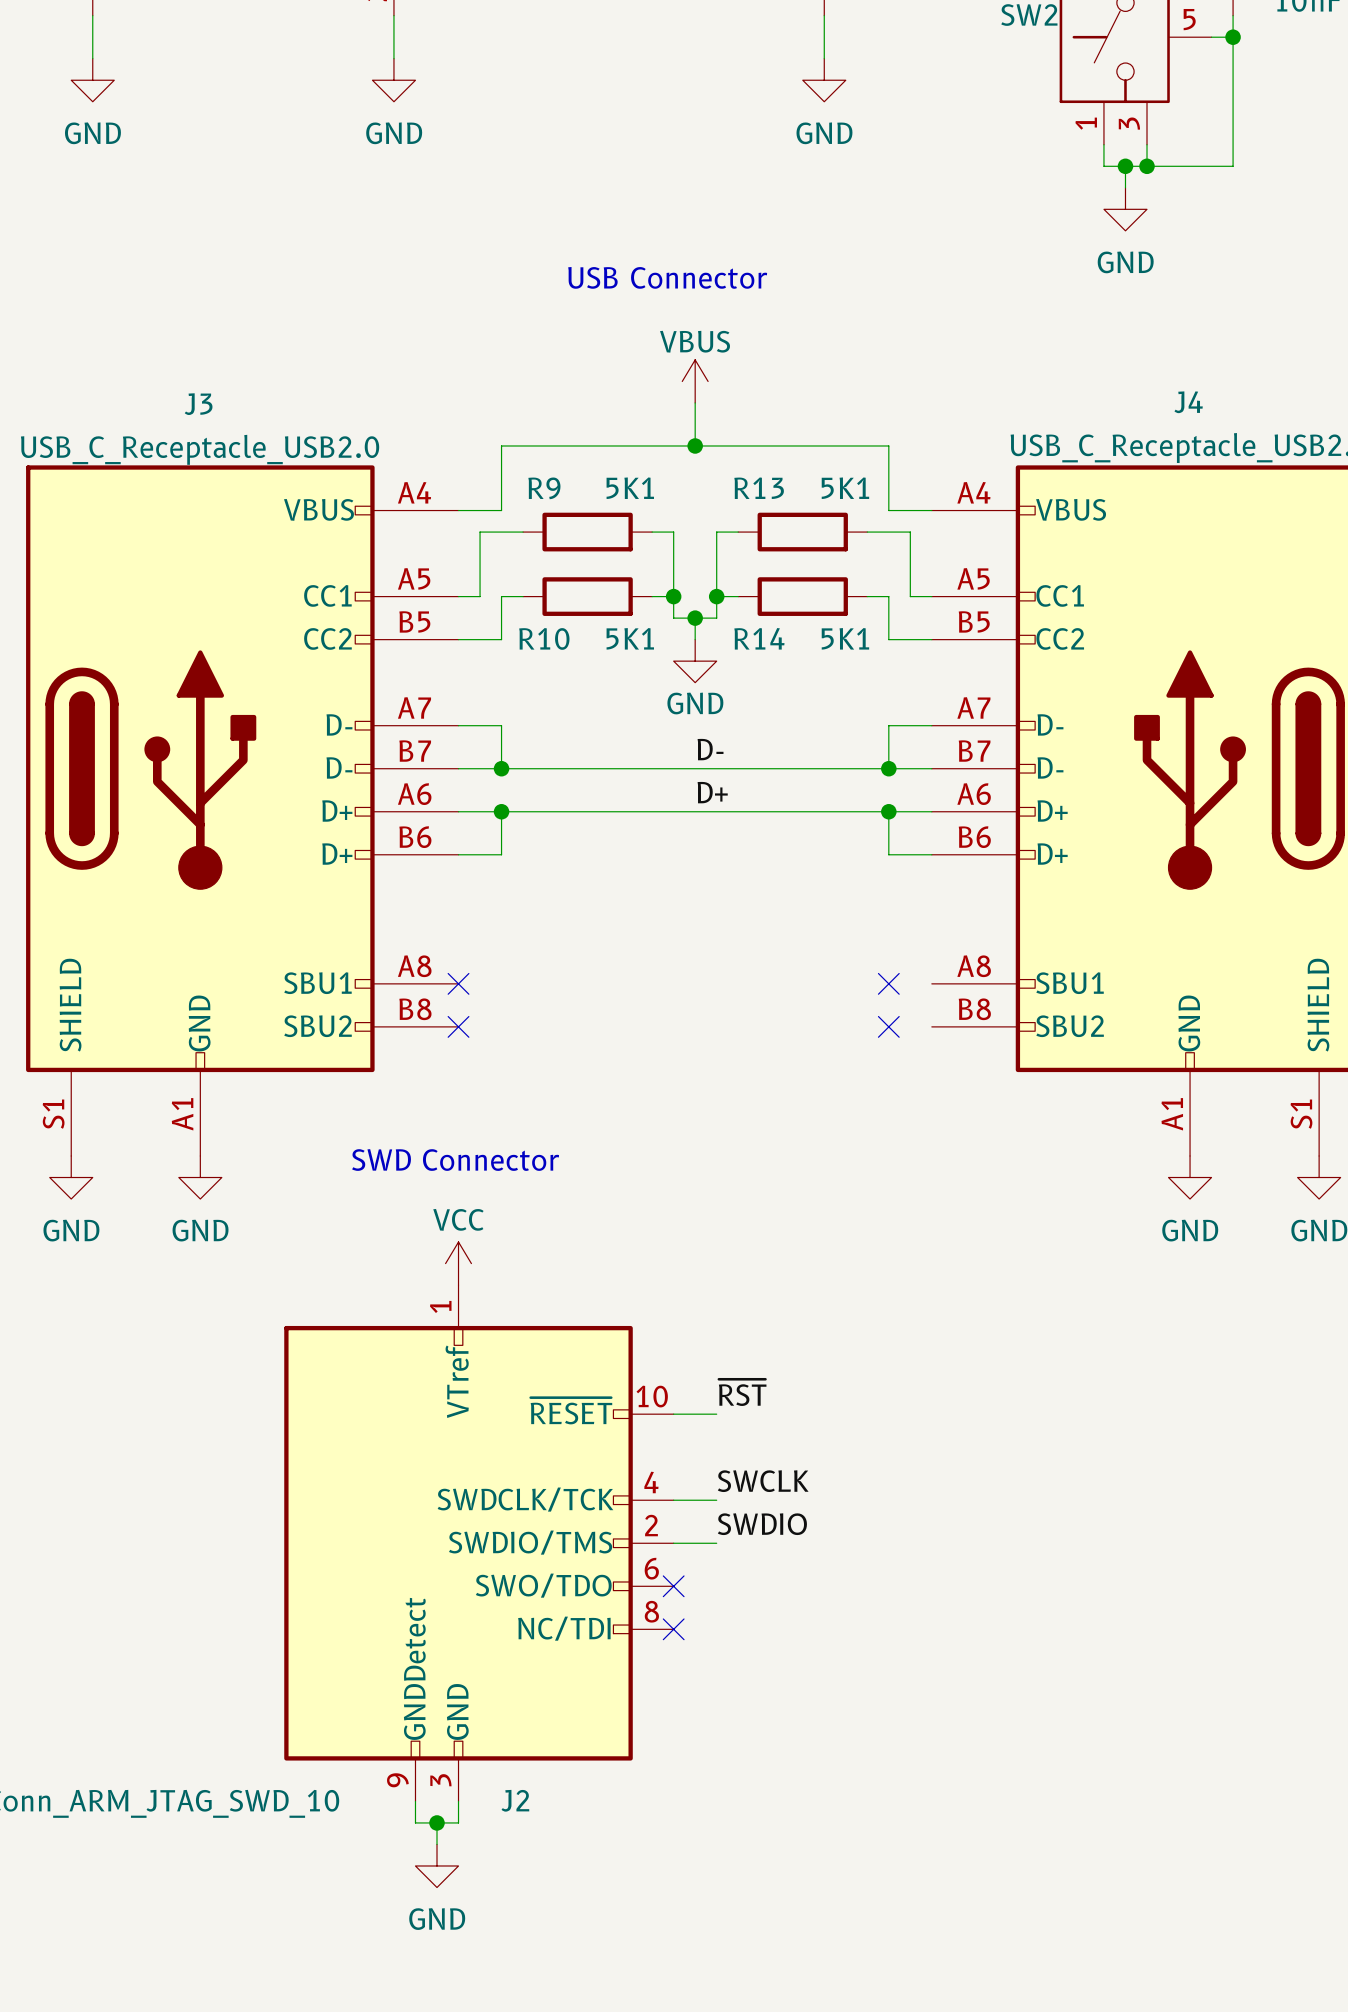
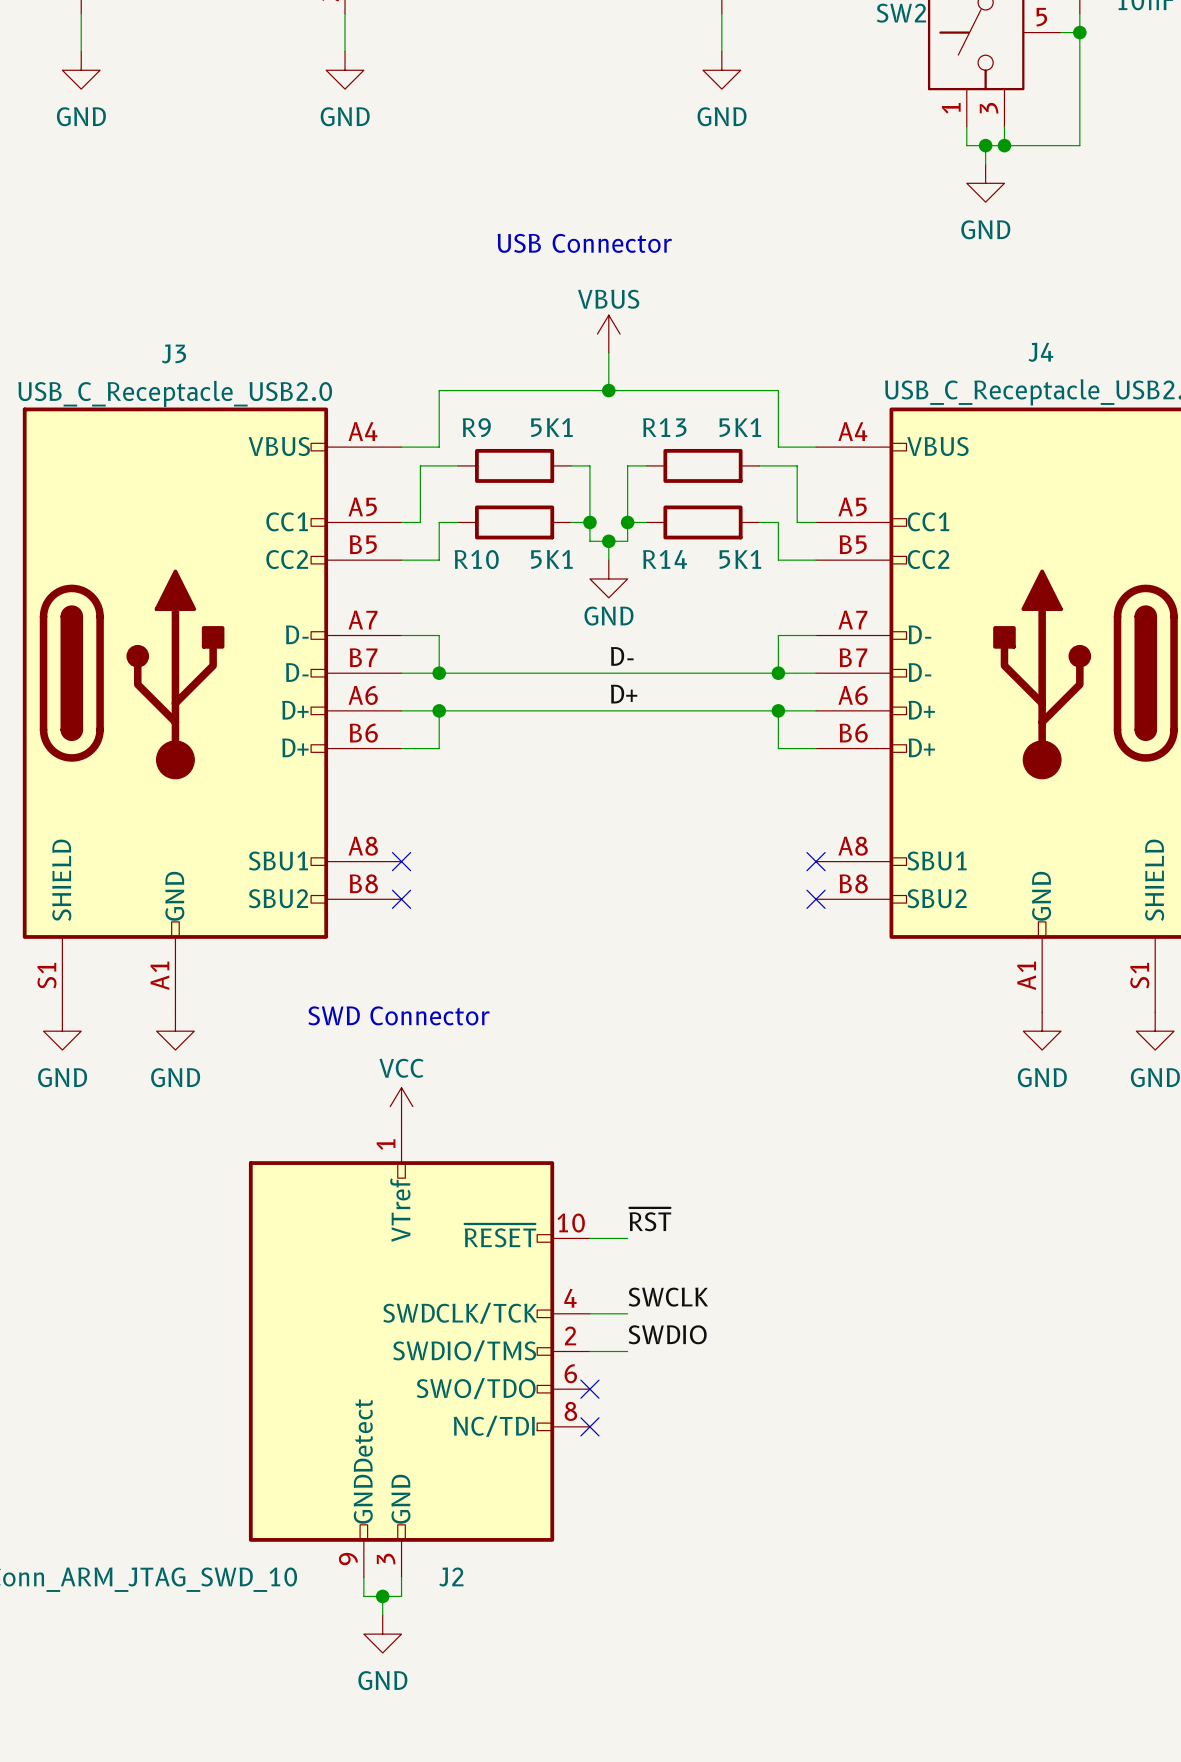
no-connect mark: (888, 983) -> none
no-connect mark: none -> (816, 861)
no-connect mark: (888, 1026) -> none
no-connect mark: none -> (816, 899)

